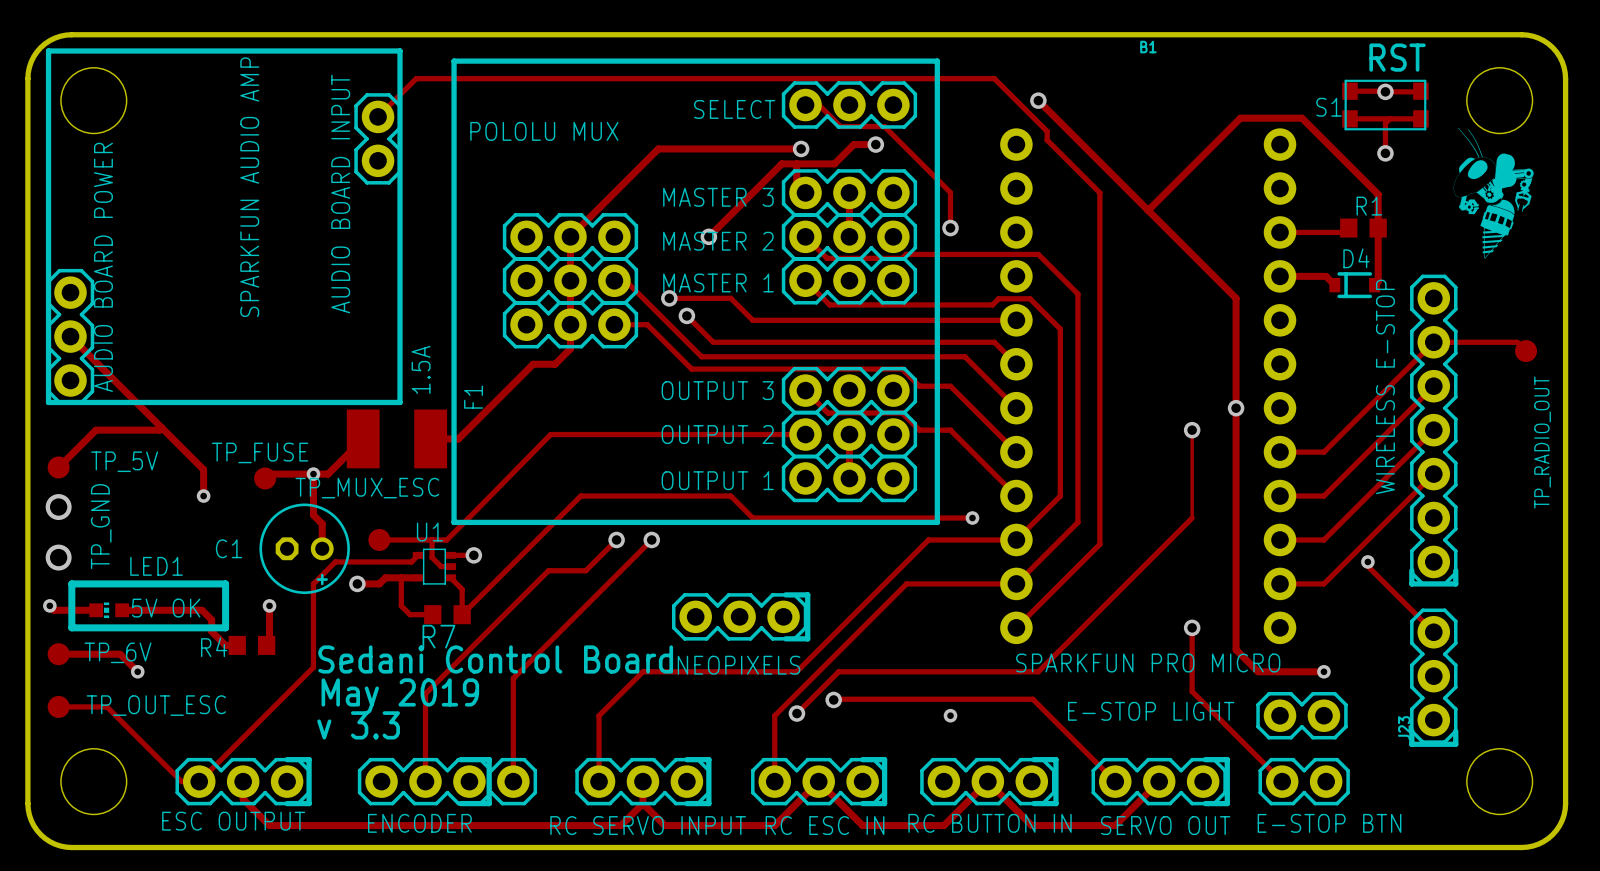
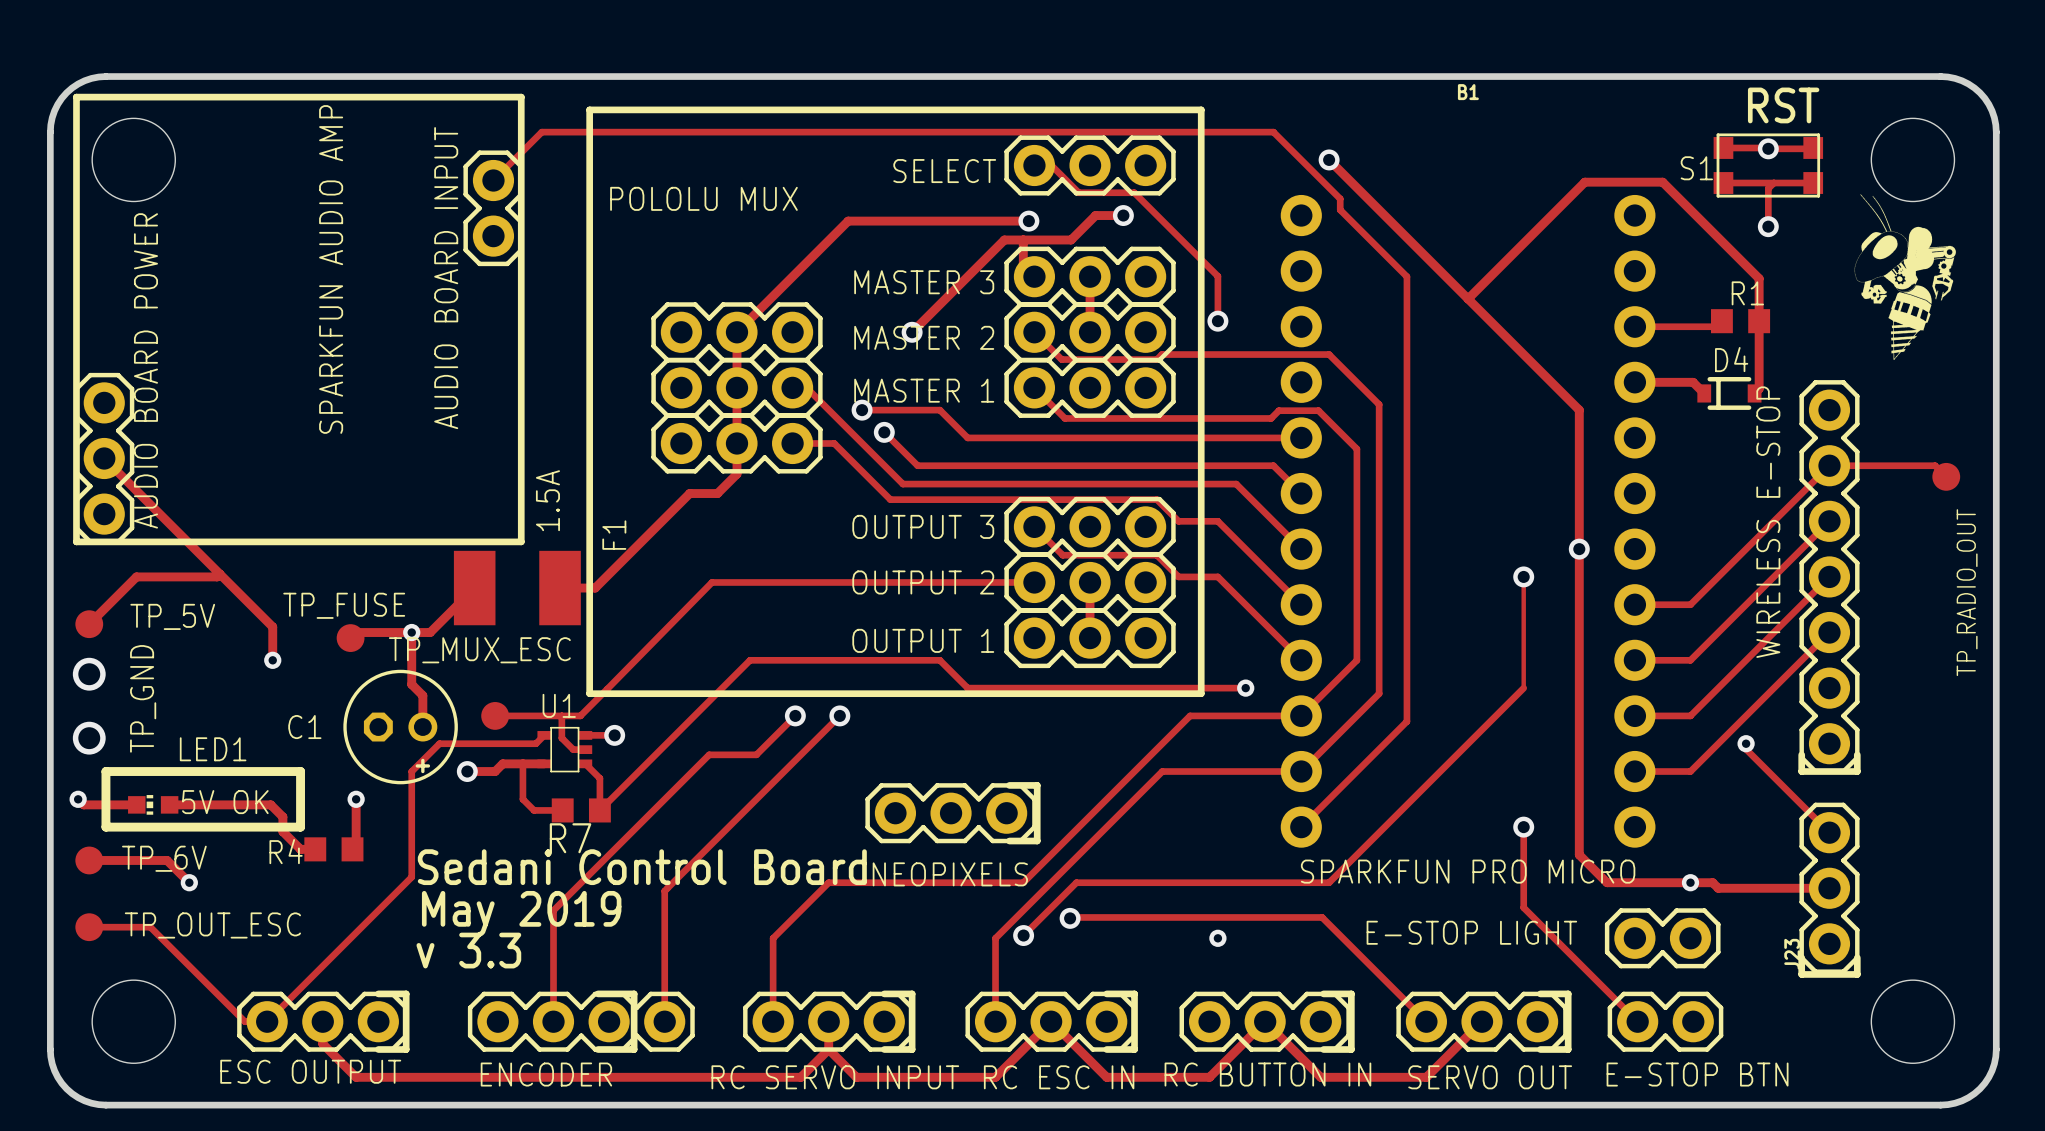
track: none -> (1690, 882) (1712, 882) (1718, 888) (1829, 888)

